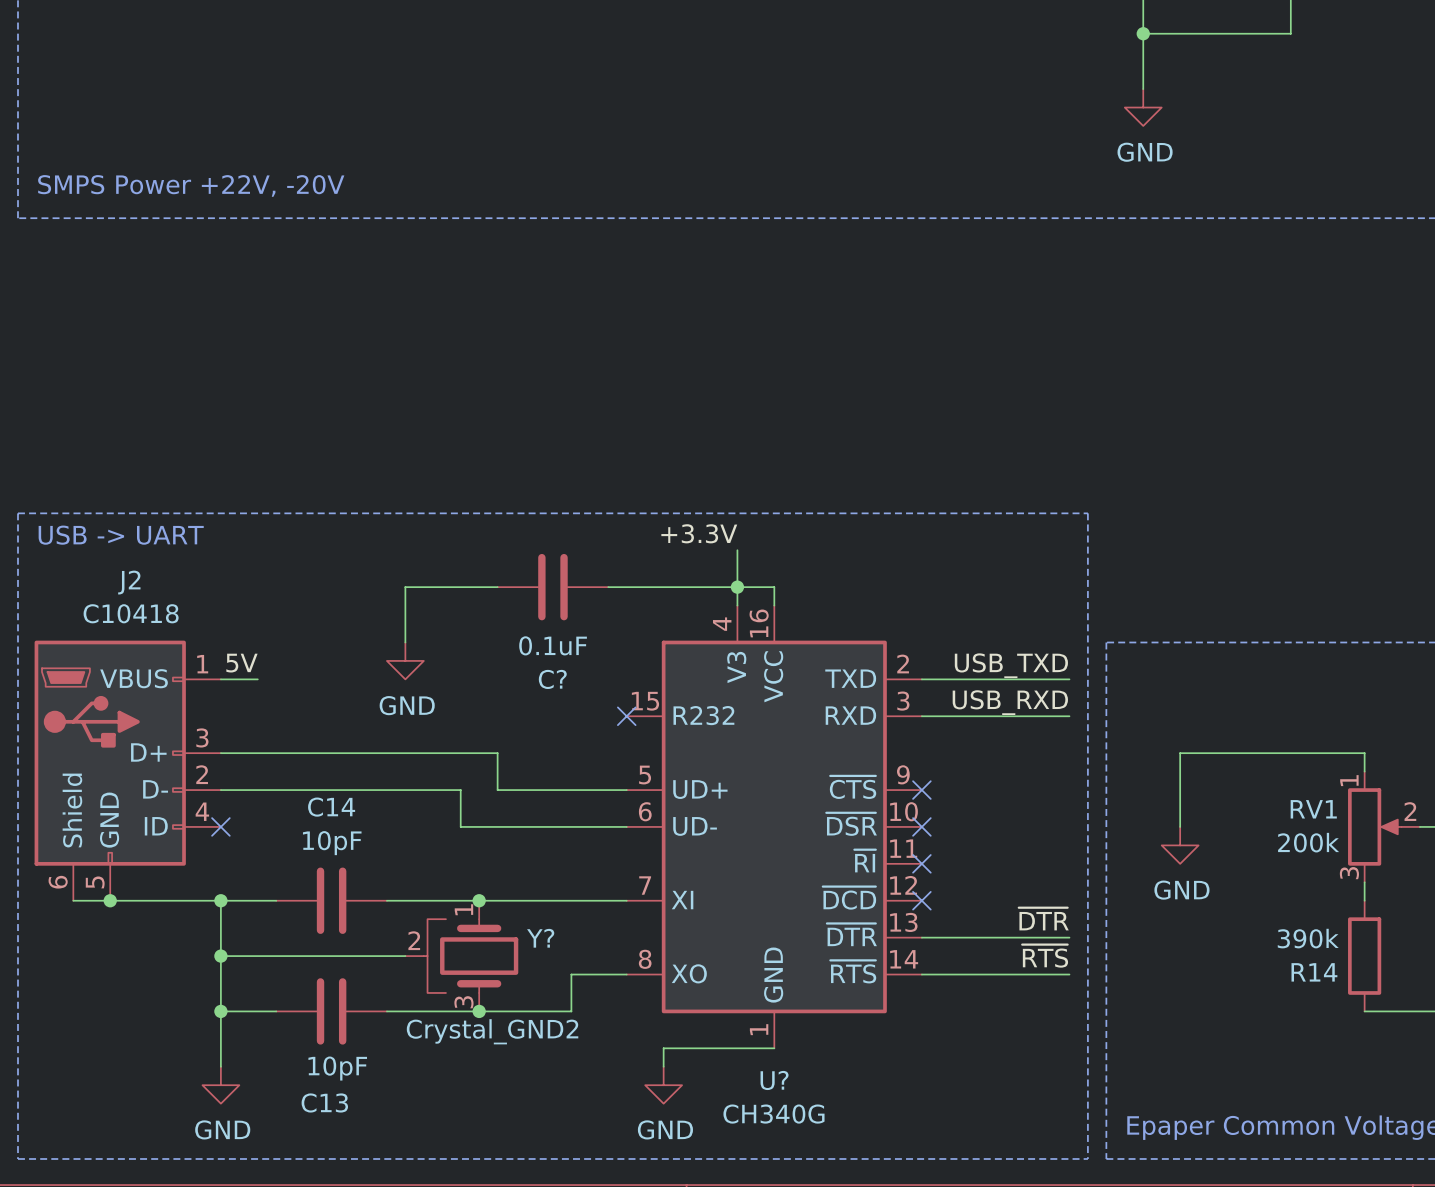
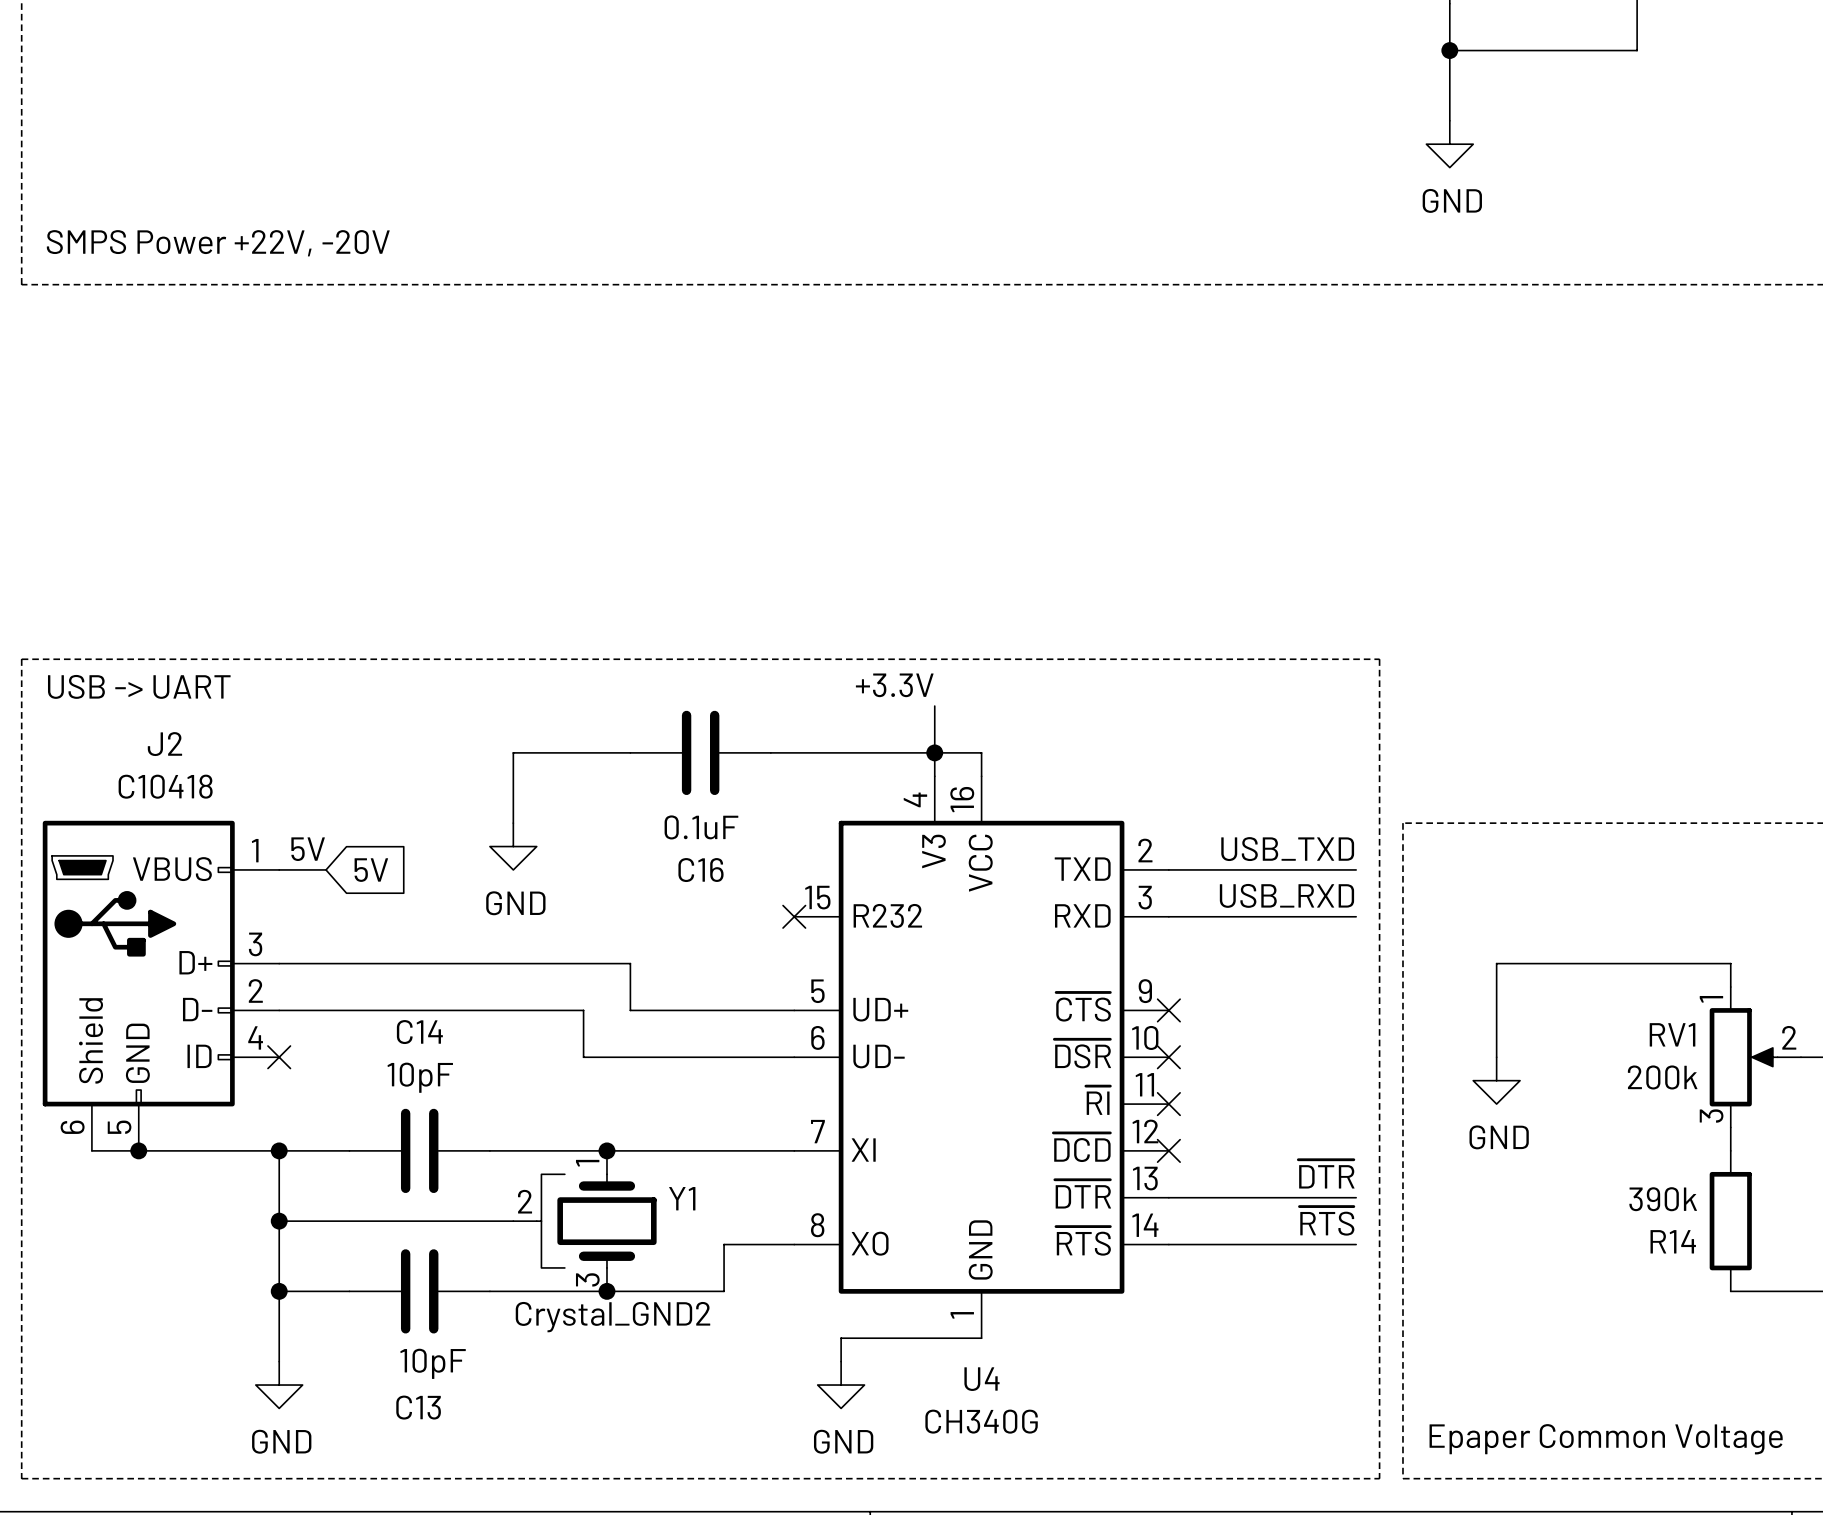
global label: none -> 5V (371, 870)
C? name: C? (552, 679) -> C16 (701, 870)
Y? name: Y? (540, 938) -> Y1 (682, 1198)
U? name: U? (774, 1080) -> U4 (981, 1379)

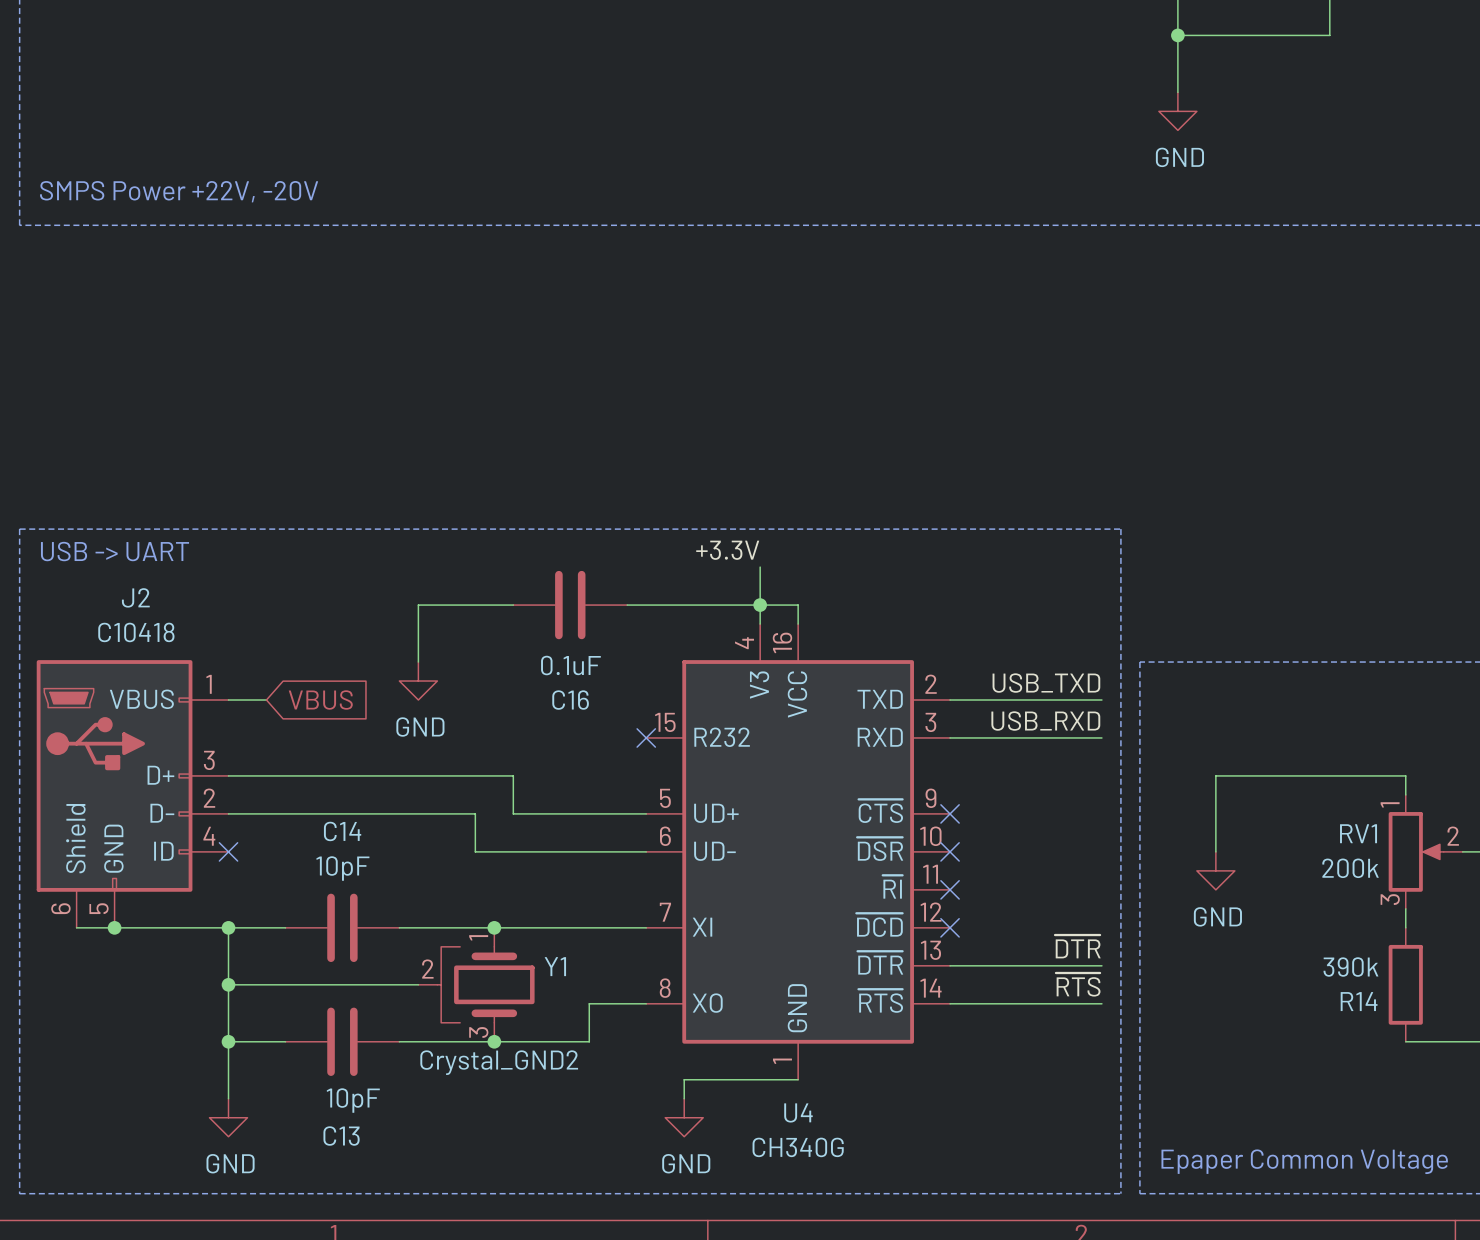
label: 5V (308, 849) -> none
global label: 5V (371, 870) -> VBUS (320, 700)

